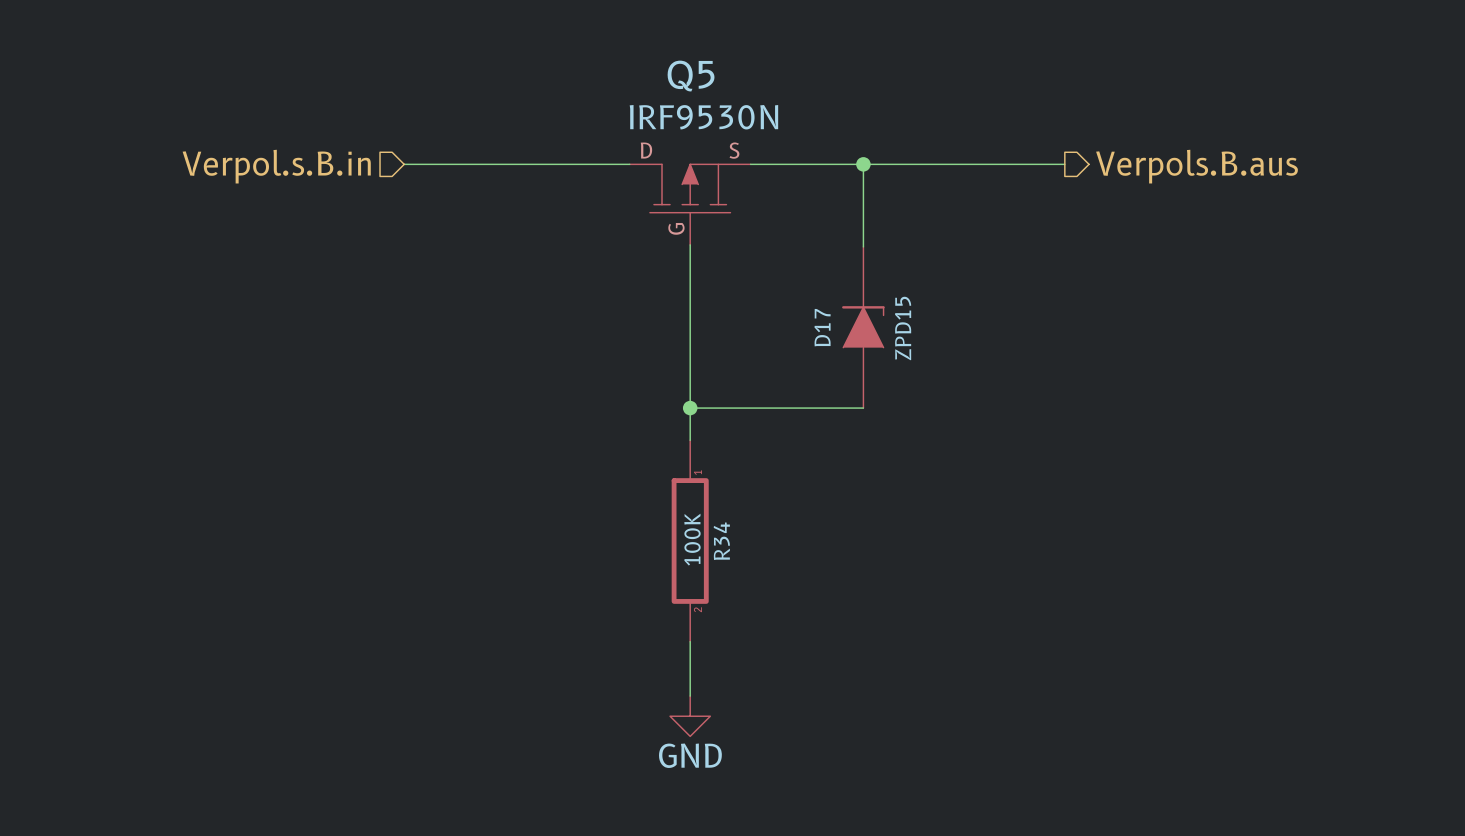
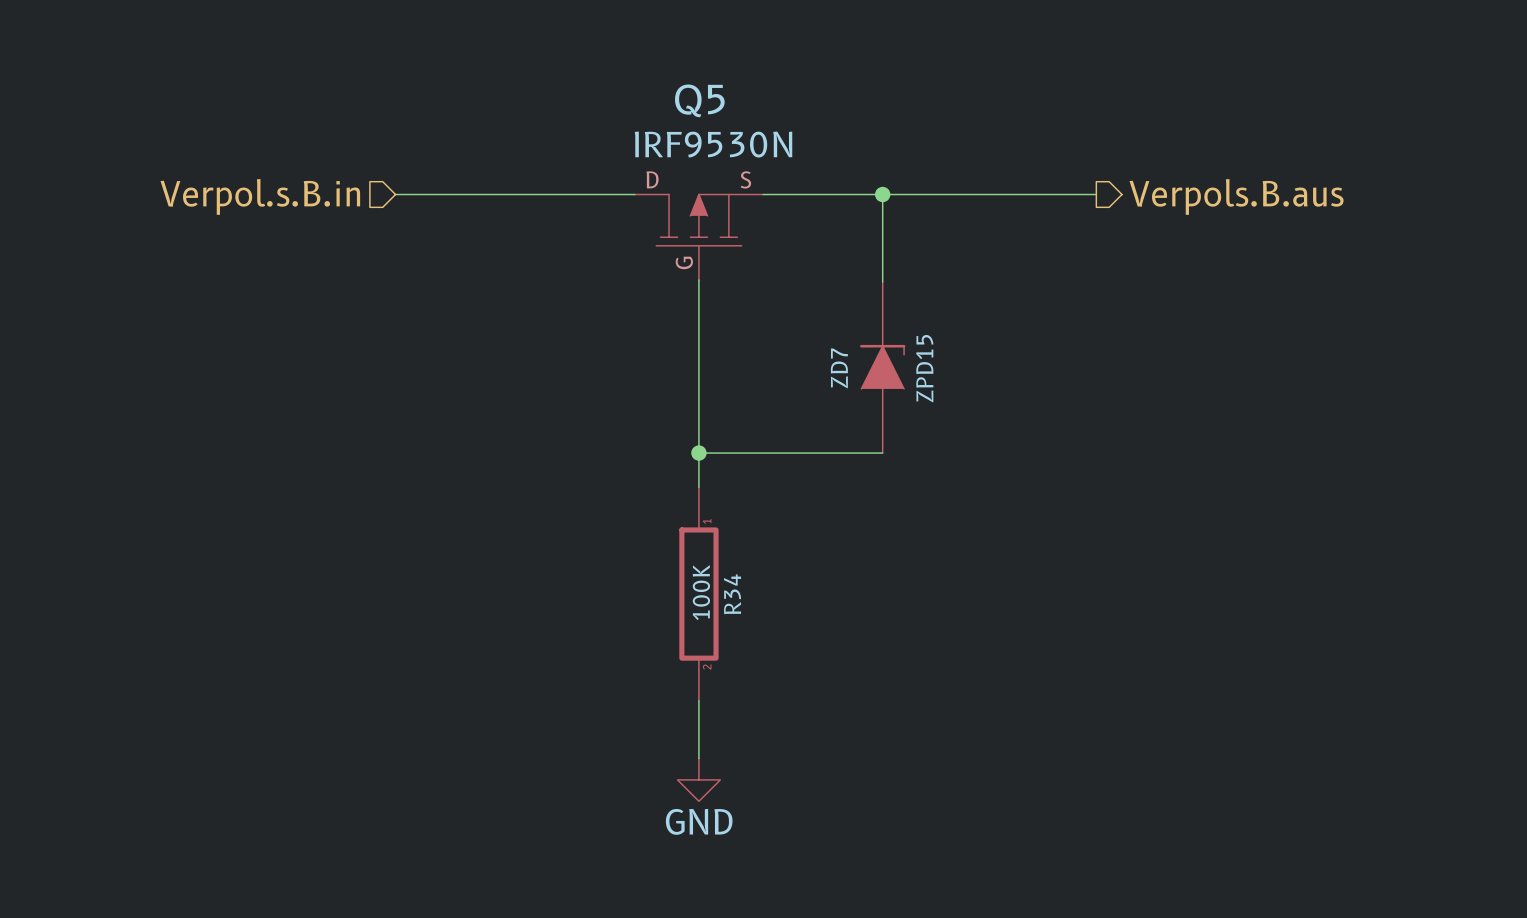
D17 name: D17 (822, 327) -> ZD7 (839, 368)

